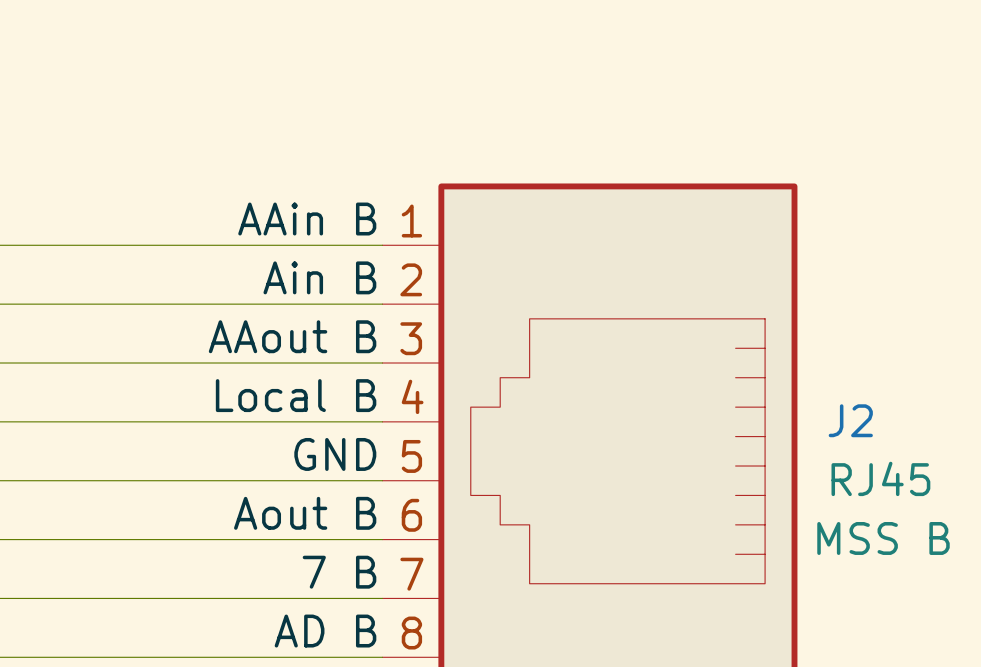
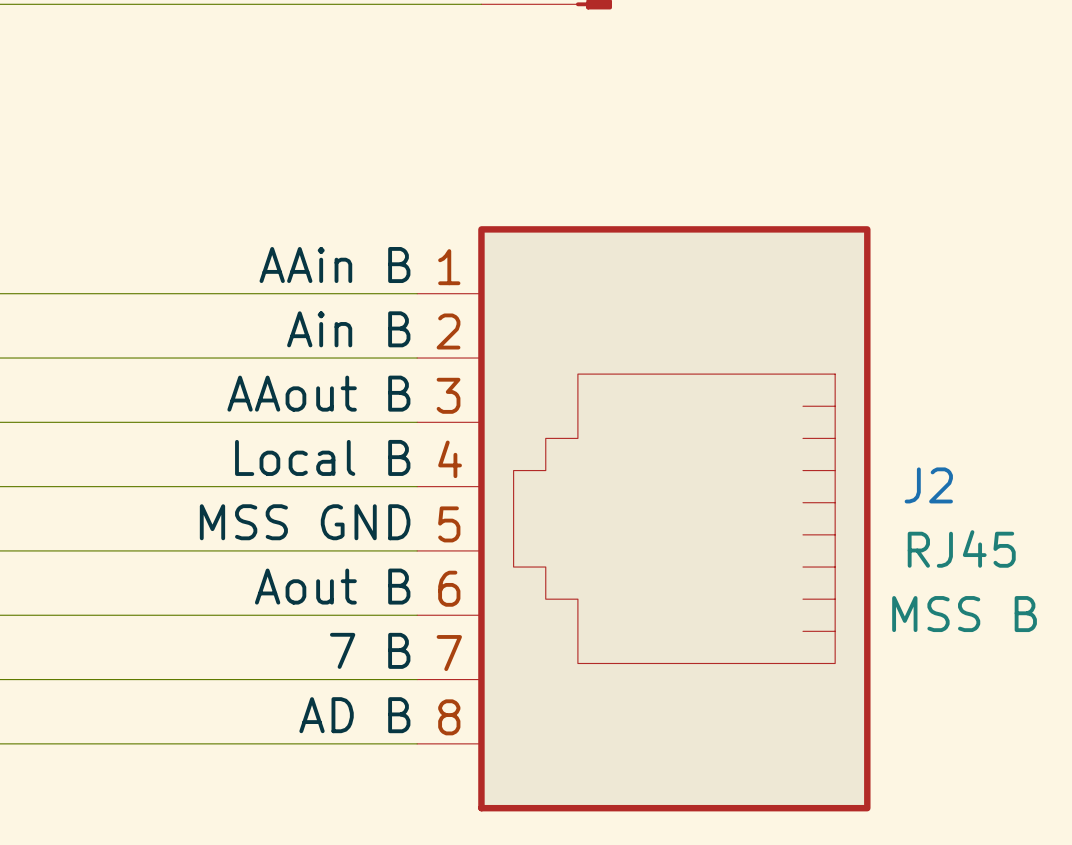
label: GND (335, 454) -> MSS GND (305, 522)

